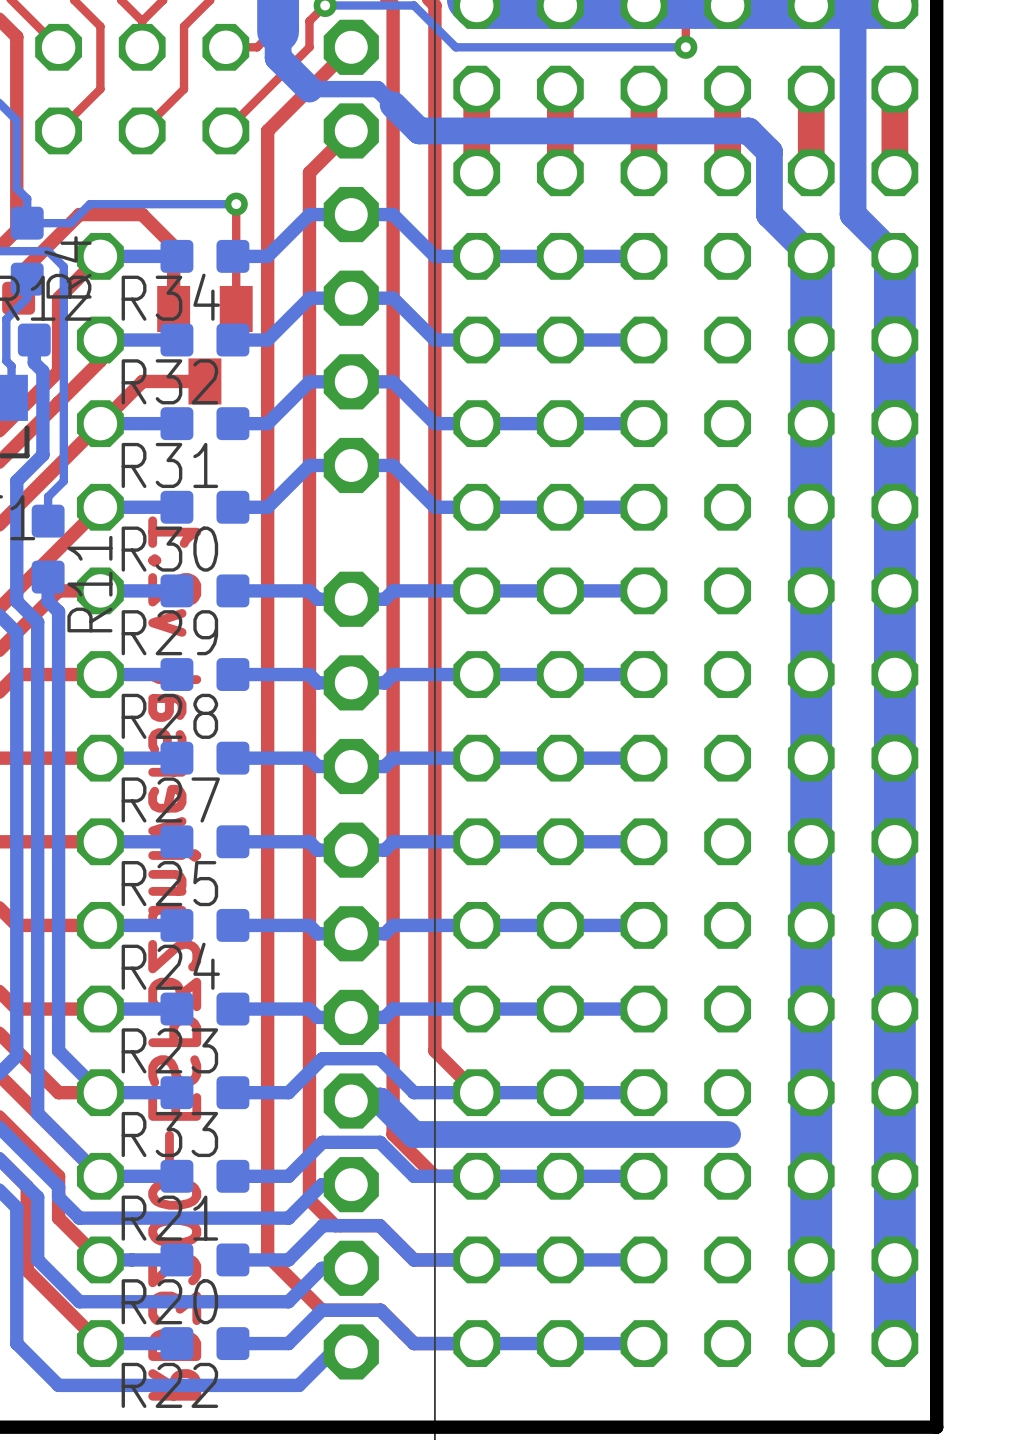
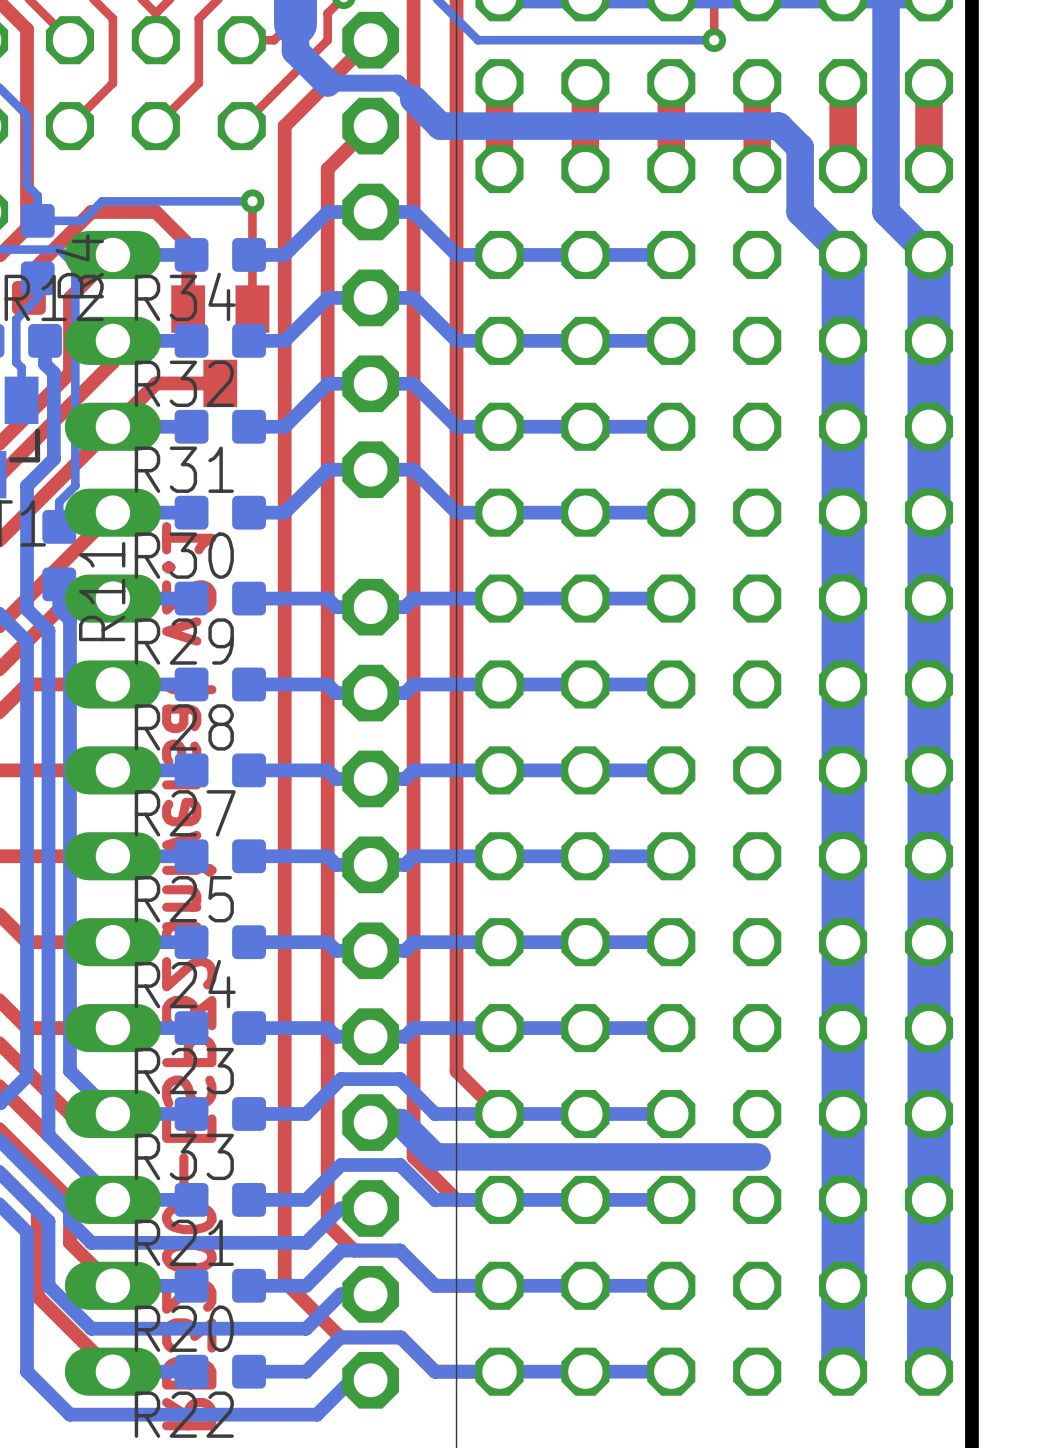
part footprint: [76, 232, 124, 1367] -> [64, 230, 162, 1396]

